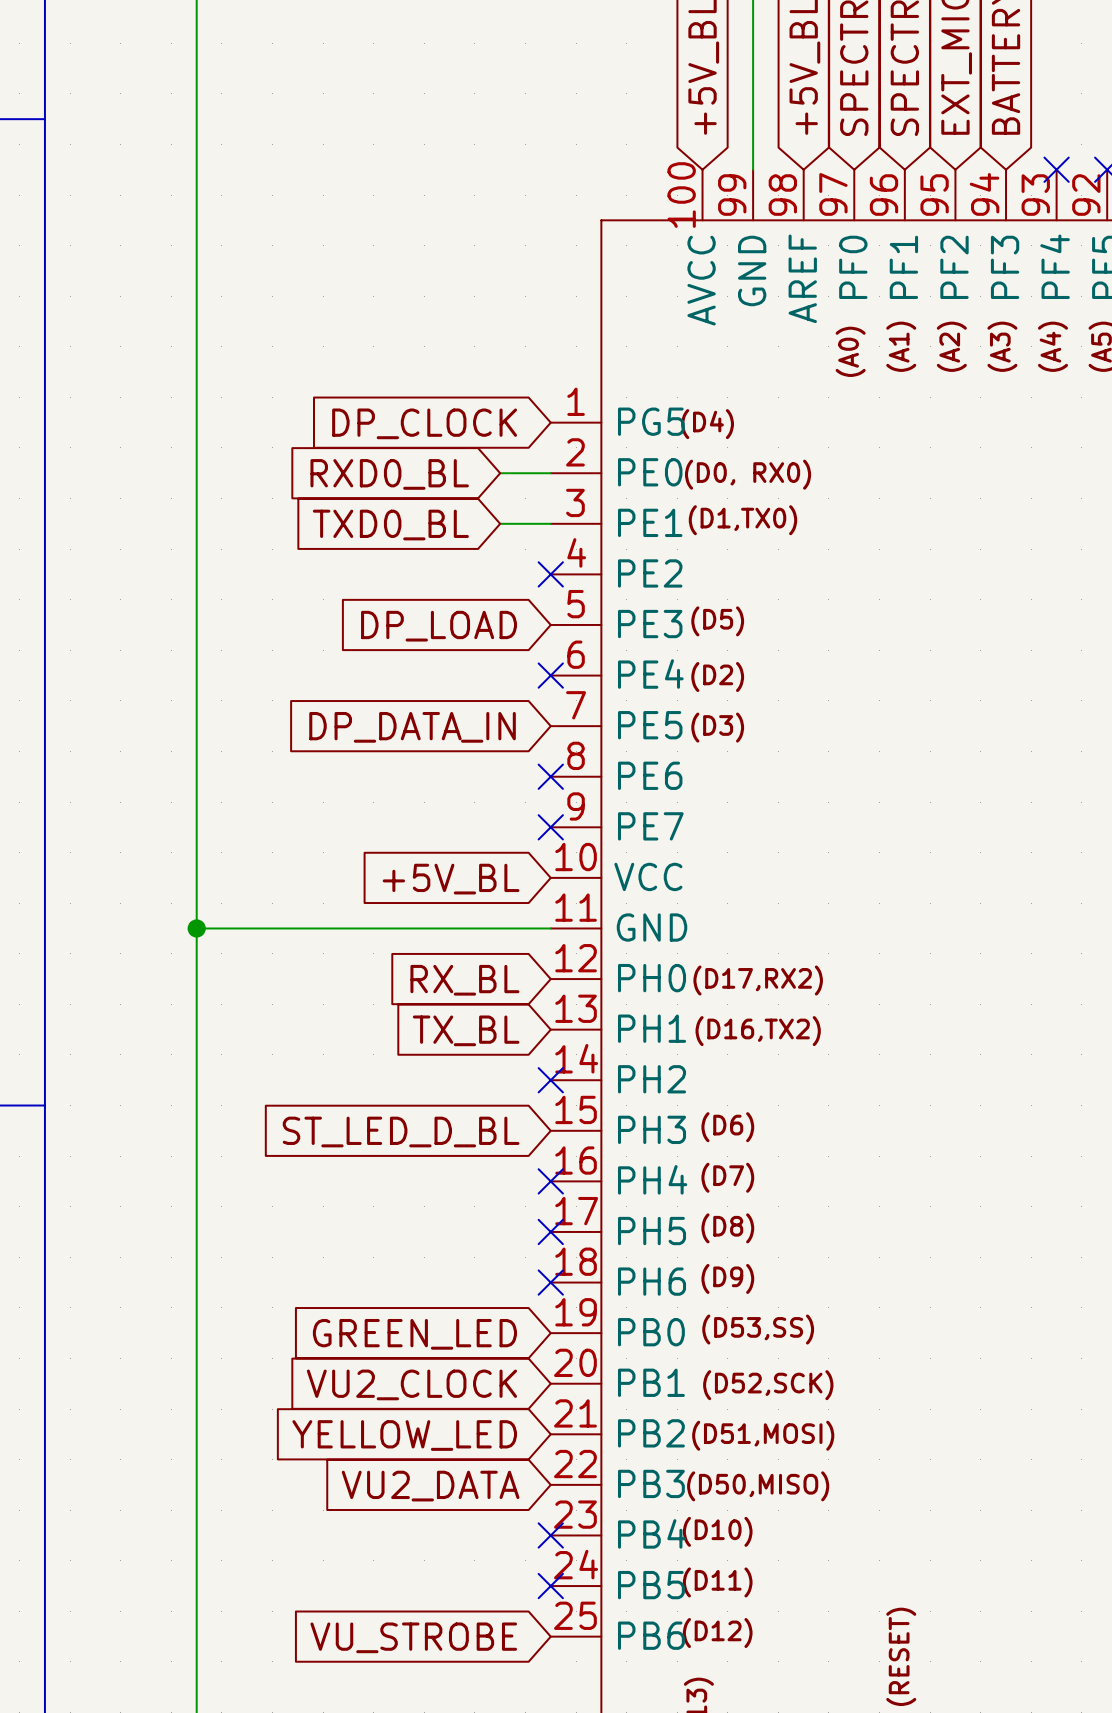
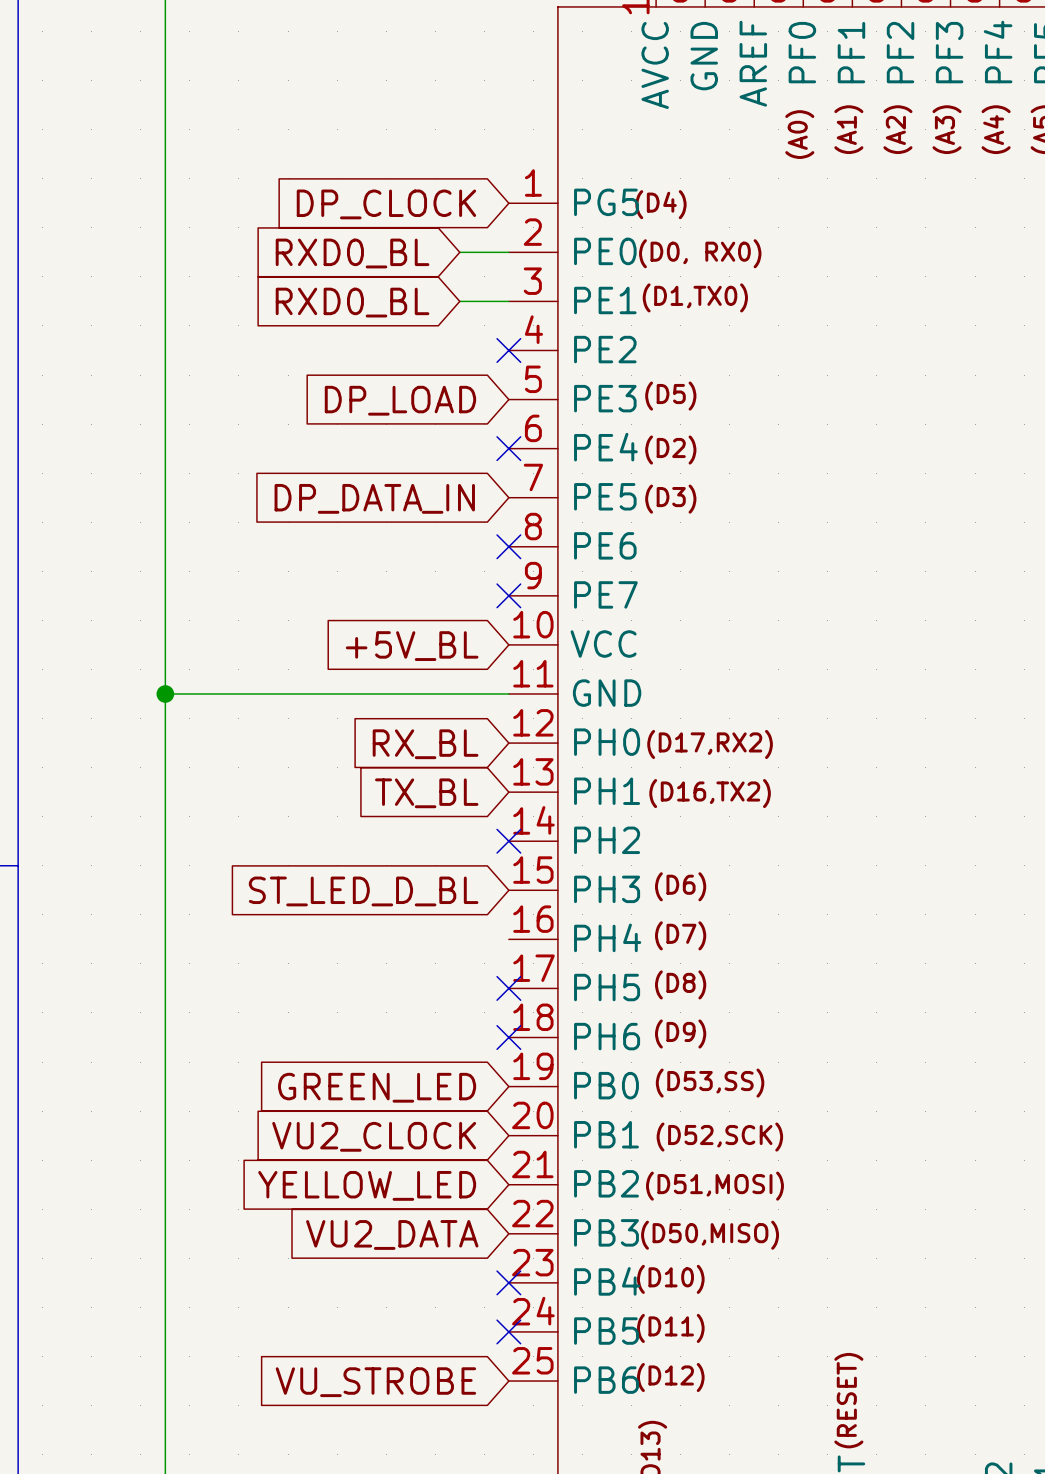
global label: TXD0_BL (390, 525) -> RXD0_BL (352, 302)
no-connect mark: (550, 1181) -> none

